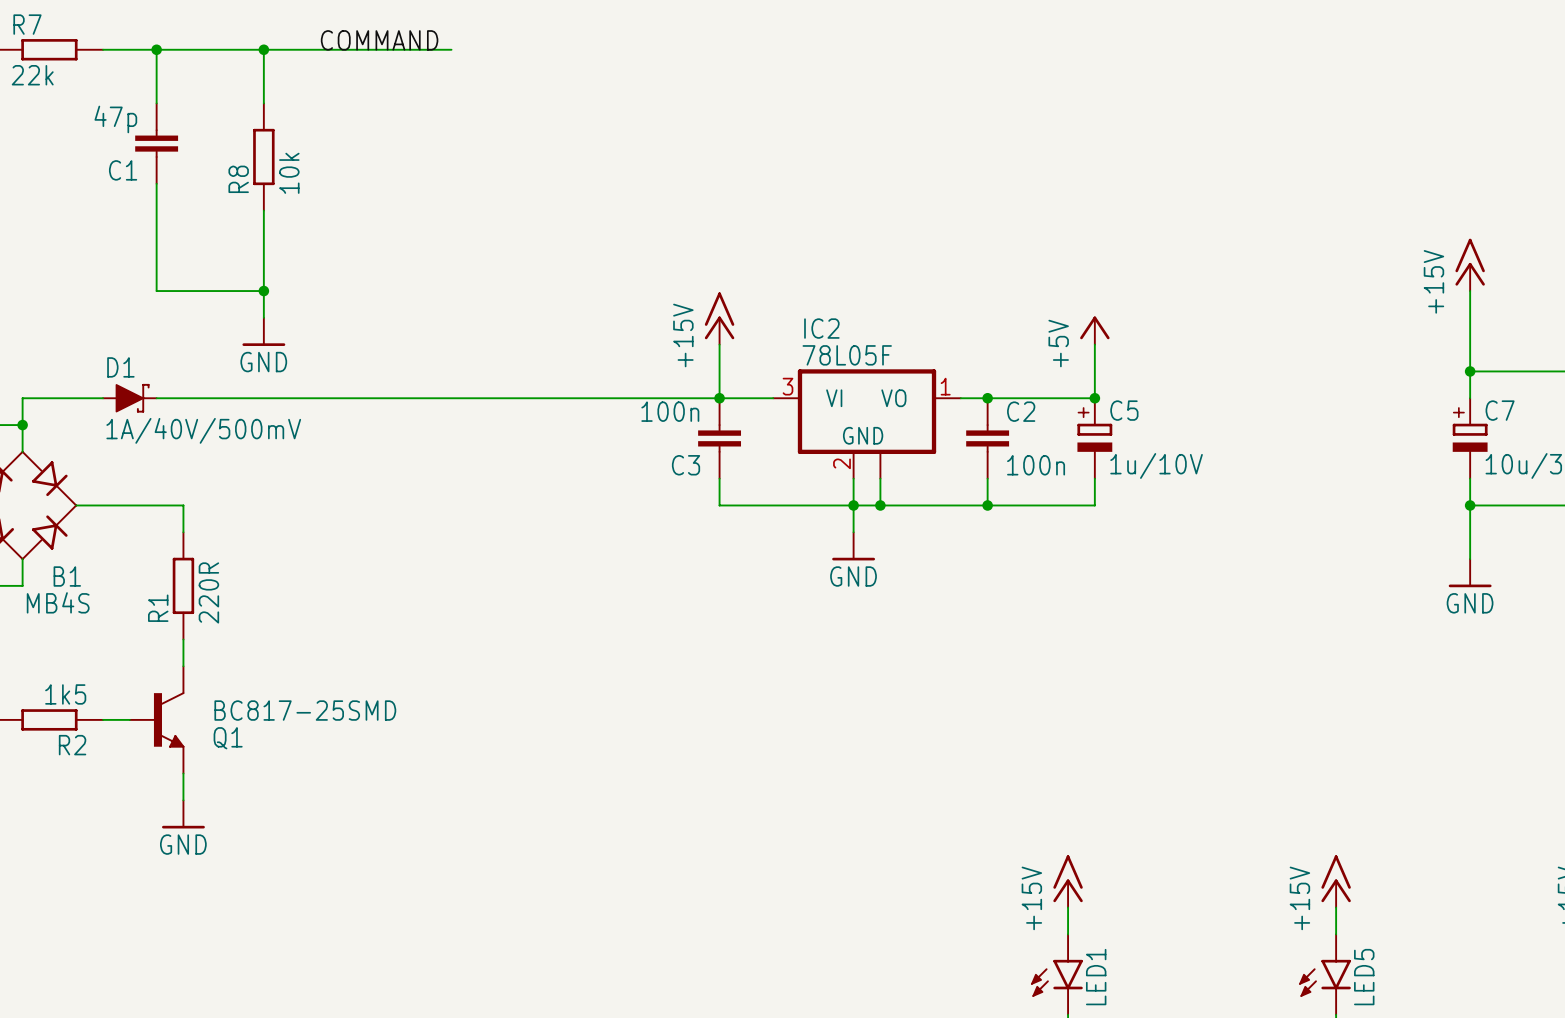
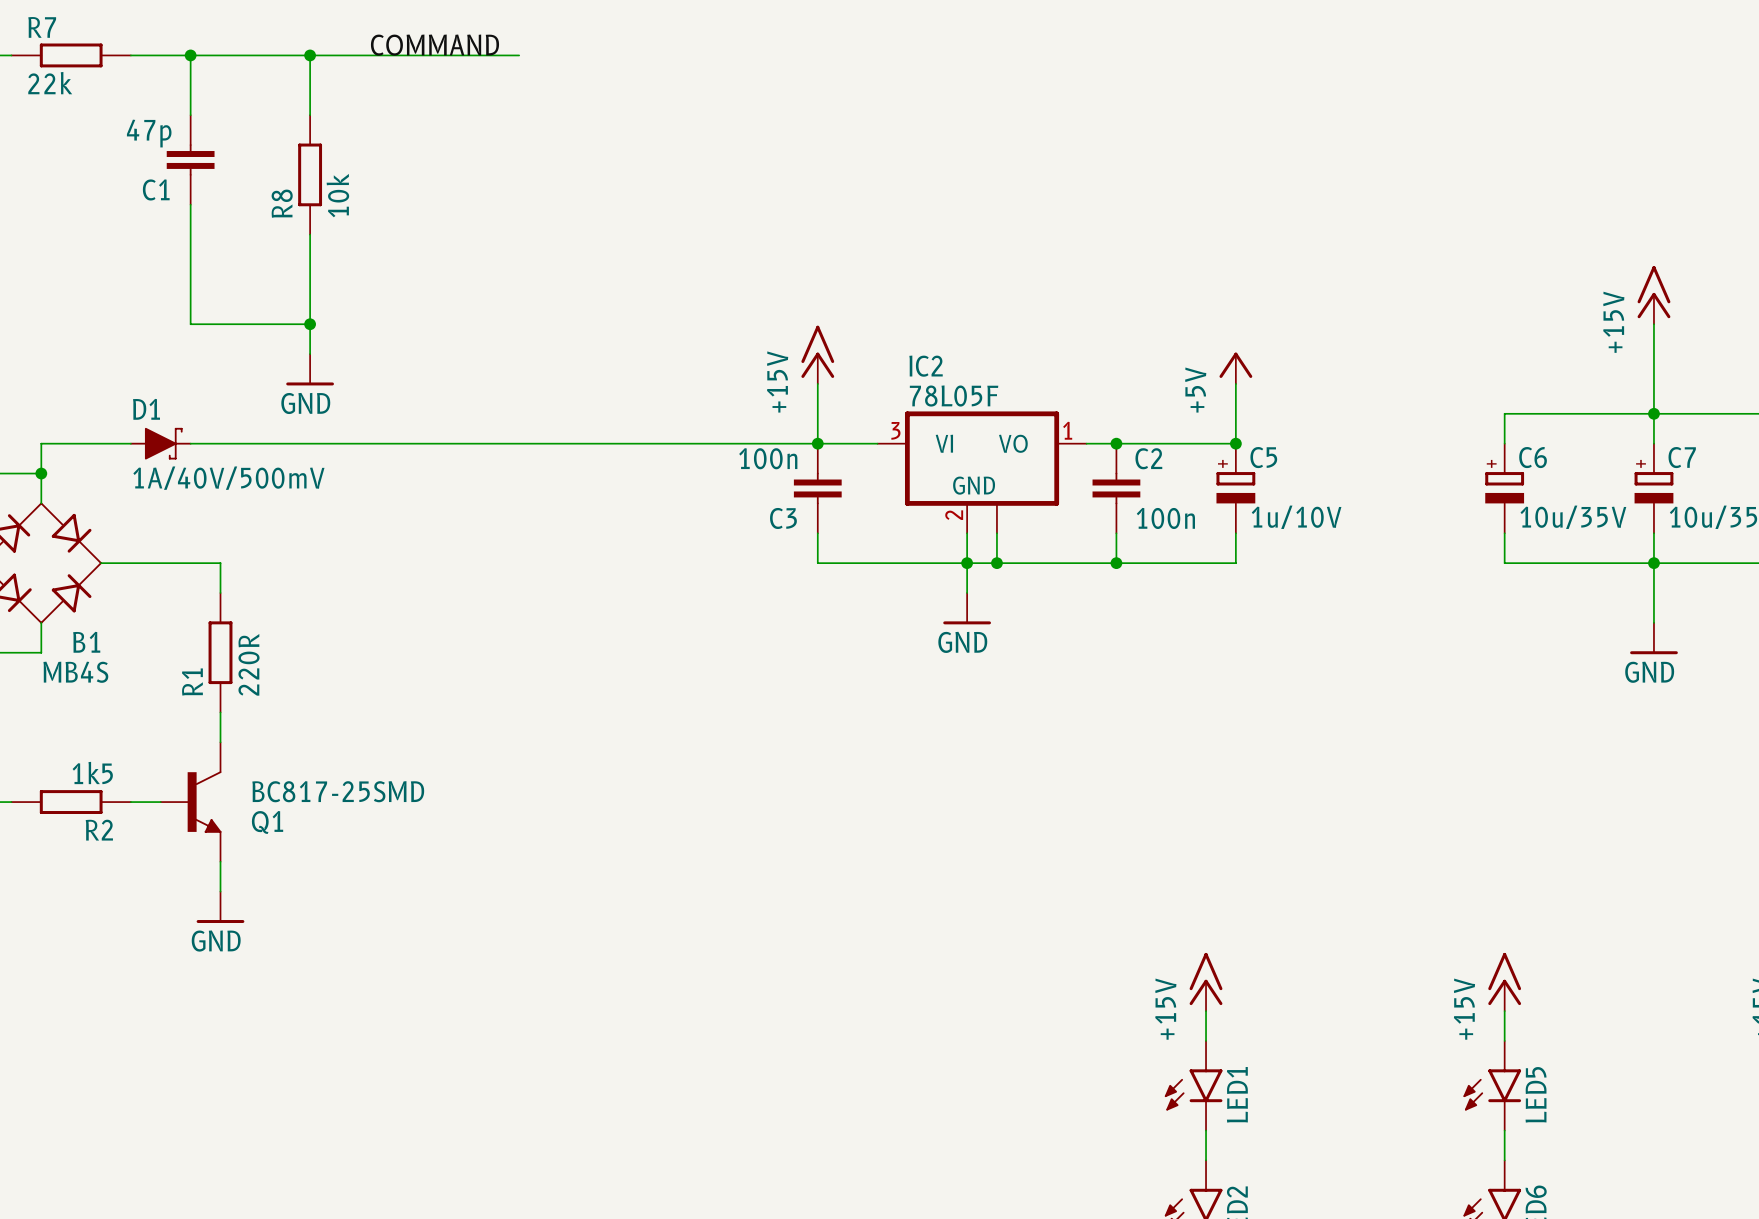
wire: none -> (1653, 413) (1504, 413) (1504, 443)
C6: none -> 10u/35V (1504, 488)
wire: none -> (1504, 533) (1504, 563) (1653, 563)

